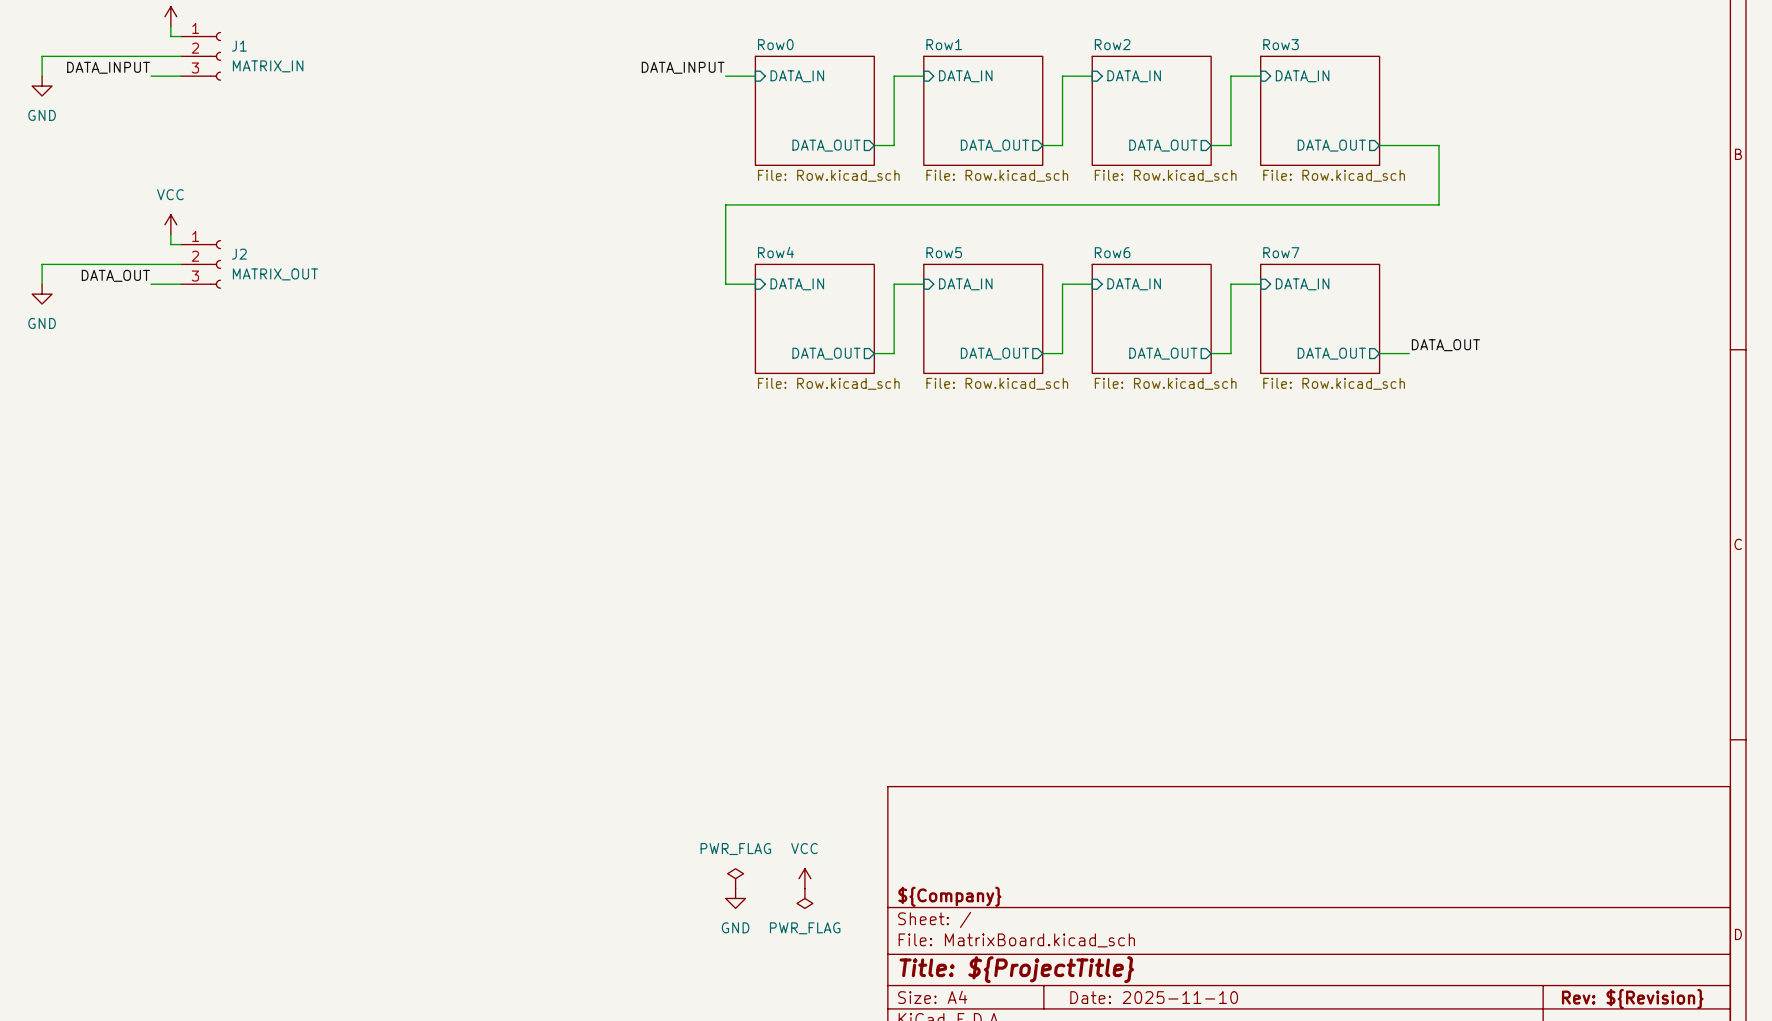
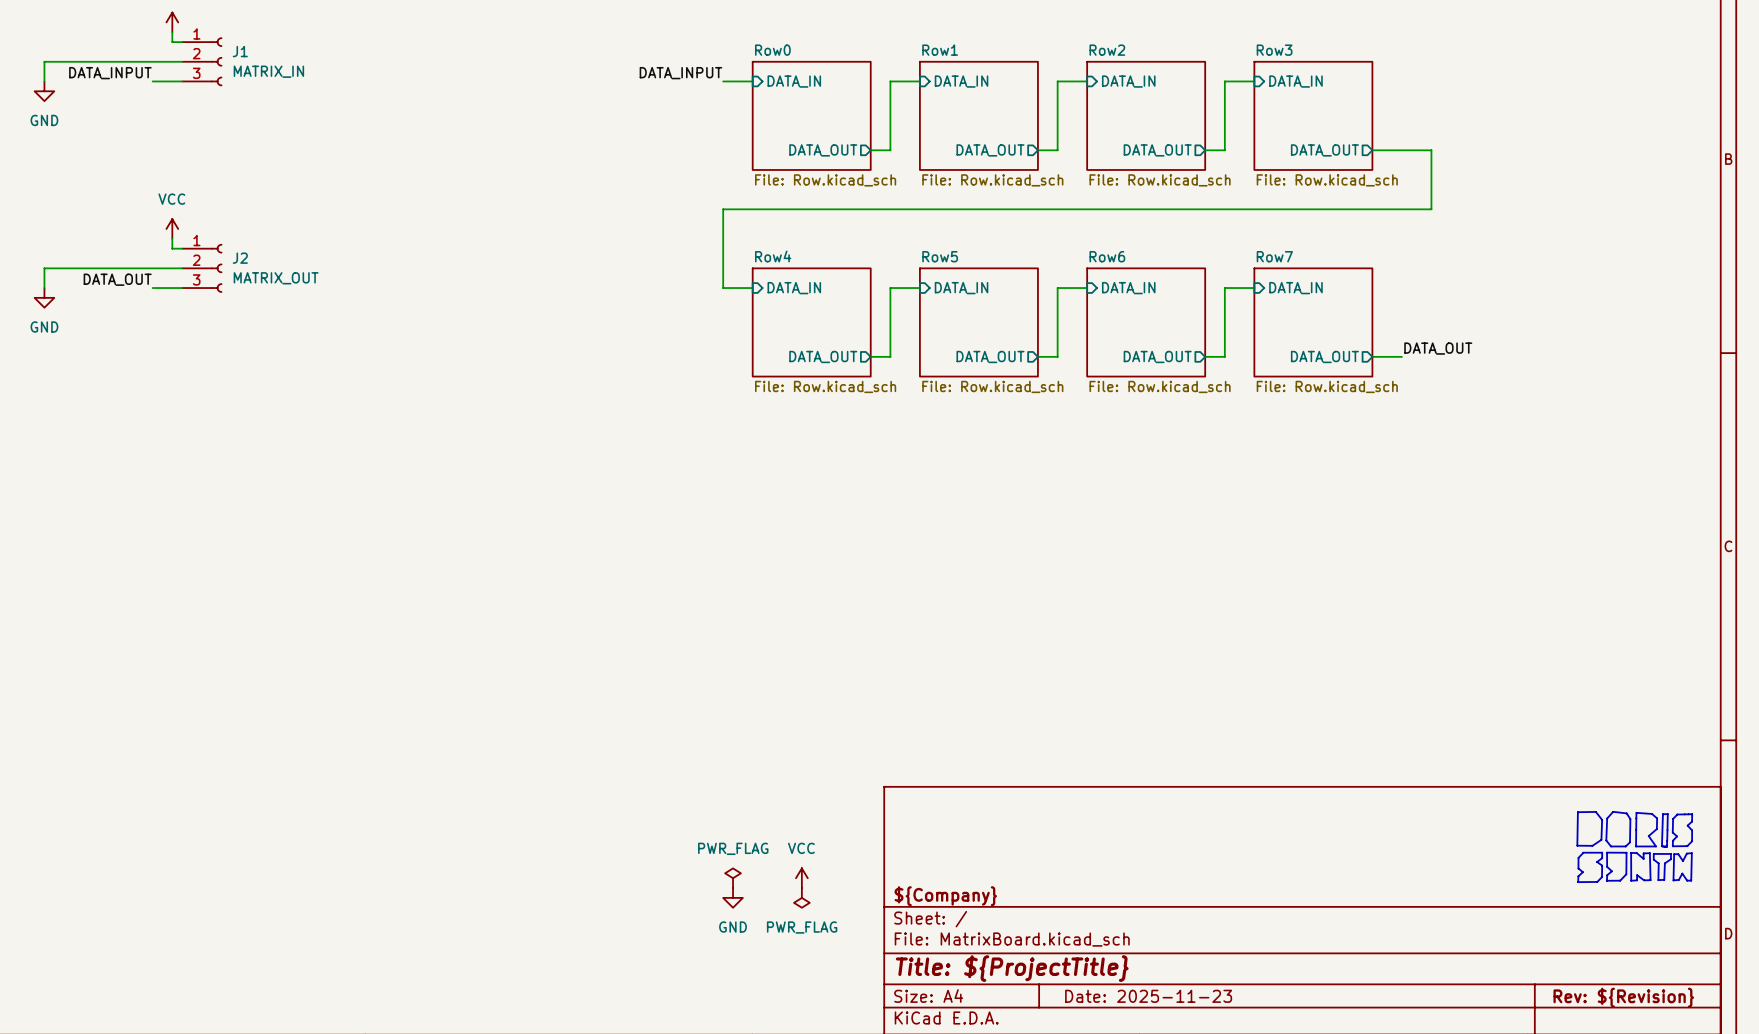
line: none -> (1595, 811) (1577, 812) (1577, 845) (1592, 845) (1601, 839) (1602, 819) (1595, 811)
line: none -> (1613, 811) (1607, 818) (1606, 840) (1611, 846) (1625, 846) (1629, 842) (1630, 819) (1626, 813) (1613, 811)
line: none -> (1636, 812) (1636, 846) (1656, 846) (1648, 836) (1656, 829) (1657, 818) (1652, 813) (1636, 812)
line: none -> (1692, 814) (1677, 814) (1673, 818) (1672, 832) (1677, 836) (1672, 840) (1672, 846) (1687, 846) (1692, 841) (1692, 830) (1687, 825) (1692, 821) (1692, 814)
line: none -> (1666, 846) (1667, 814) (1662, 814) (1661, 846) (1666, 846)
line: none -> (1583, 852) (1578, 857) (1578, 868) (1582, 872) (1578, 876) (1578, 882) (1597, 881) (1601, 877) (1602, 865) (1597, 862) (1602, 858) (1602, 852) (1583, 852)
line: none -> (1607, 852) (1607, 866) (1611, 871) (1607, 875) (1606, 880) (1620, 880) (1626, 874) (1626, 852) (1607, 852)
line: none -> (1631, 852) (1631, 880) (1637, 880) (1637, 875) (1644, 880) (1650, 880) (1649, 853) (1643, 853) (1643, 858) (1636, 853) (1631, 852)
line: none -> (1691, 853) (1686, 853) (1683, 861) (1678, 854) (1674, 854) (1673, 880) (1678, 879) (1682, 873) (1687, 880) (1691, 880) (1691, 853)
line: none -> (1653, 853) (1653, 859) (1658, 863) (1658, 880) (1664, 879) (1664, 863) (1670, 859) (1670, 853) (1653, 853)
title block: Date: 2025-11-10 (1154, 997) -> Date: 2025-11-23 (1148, 996)

